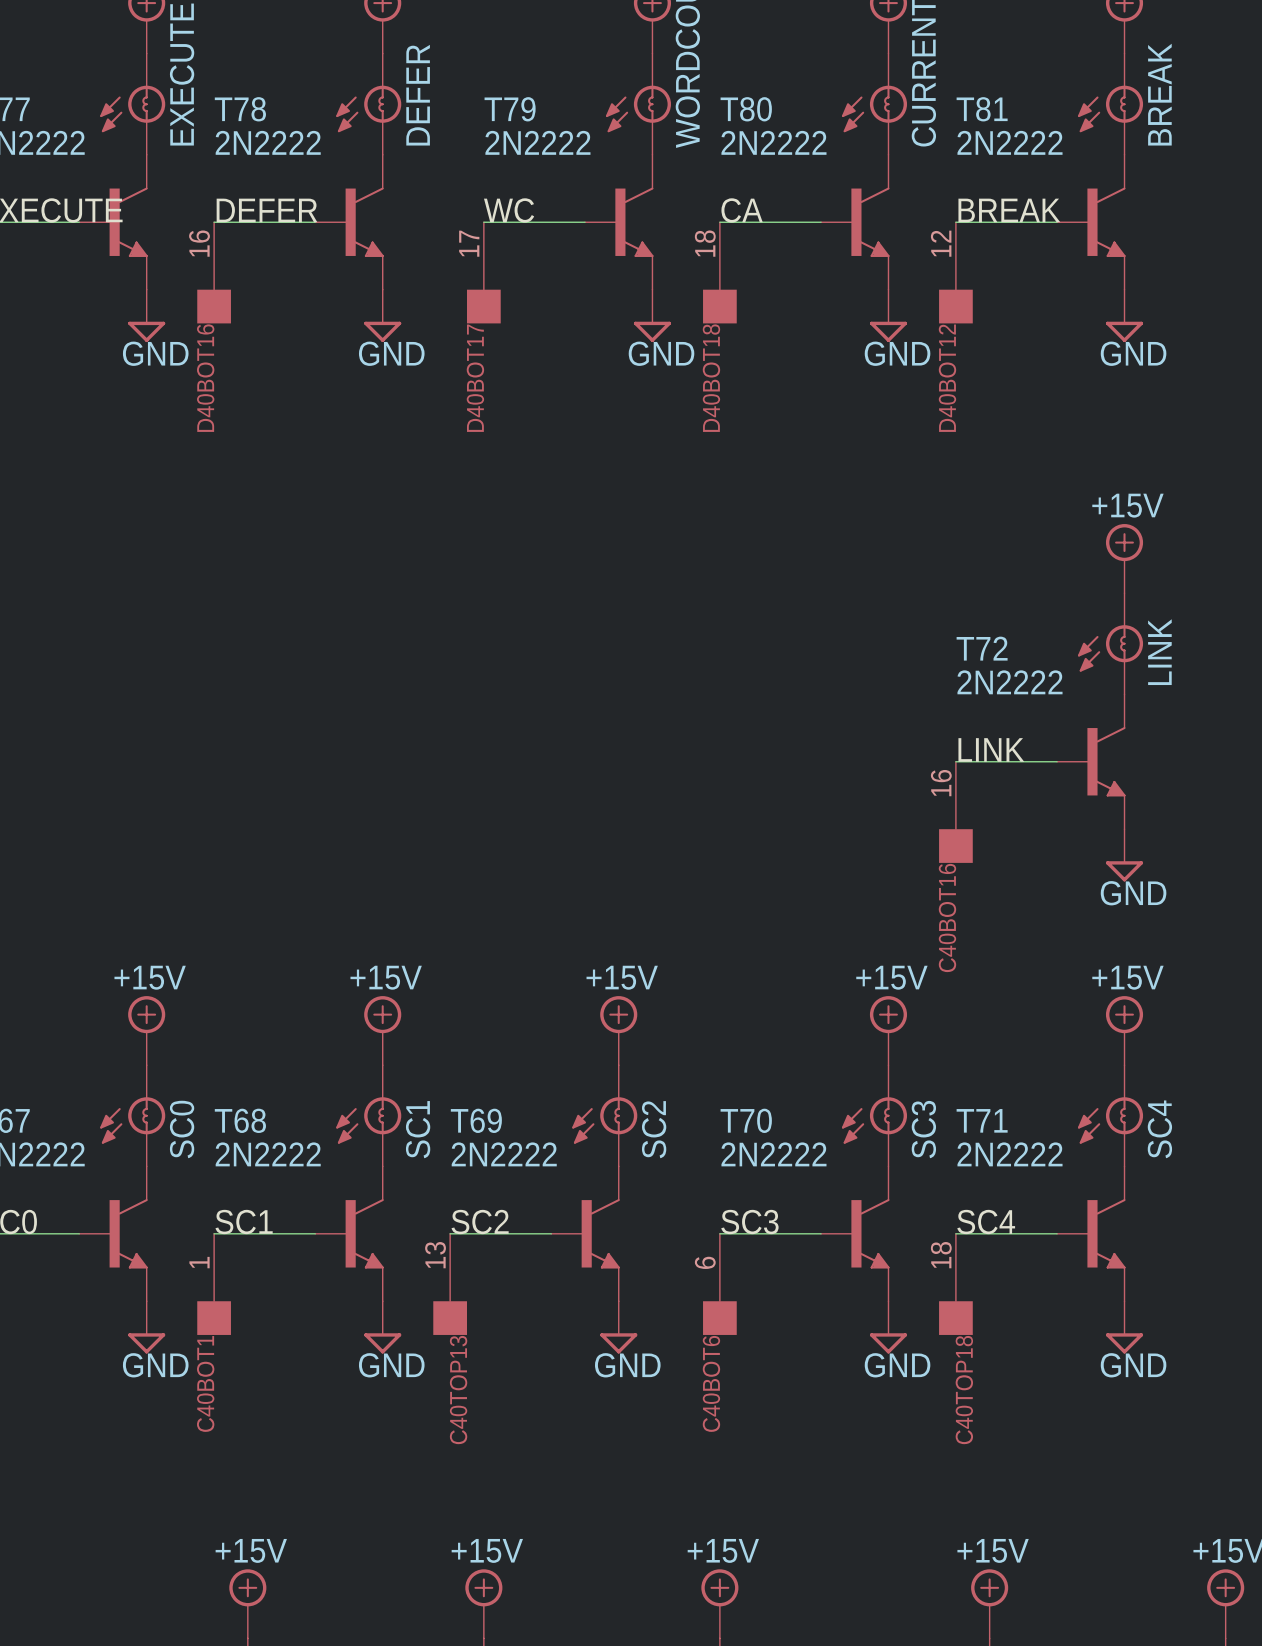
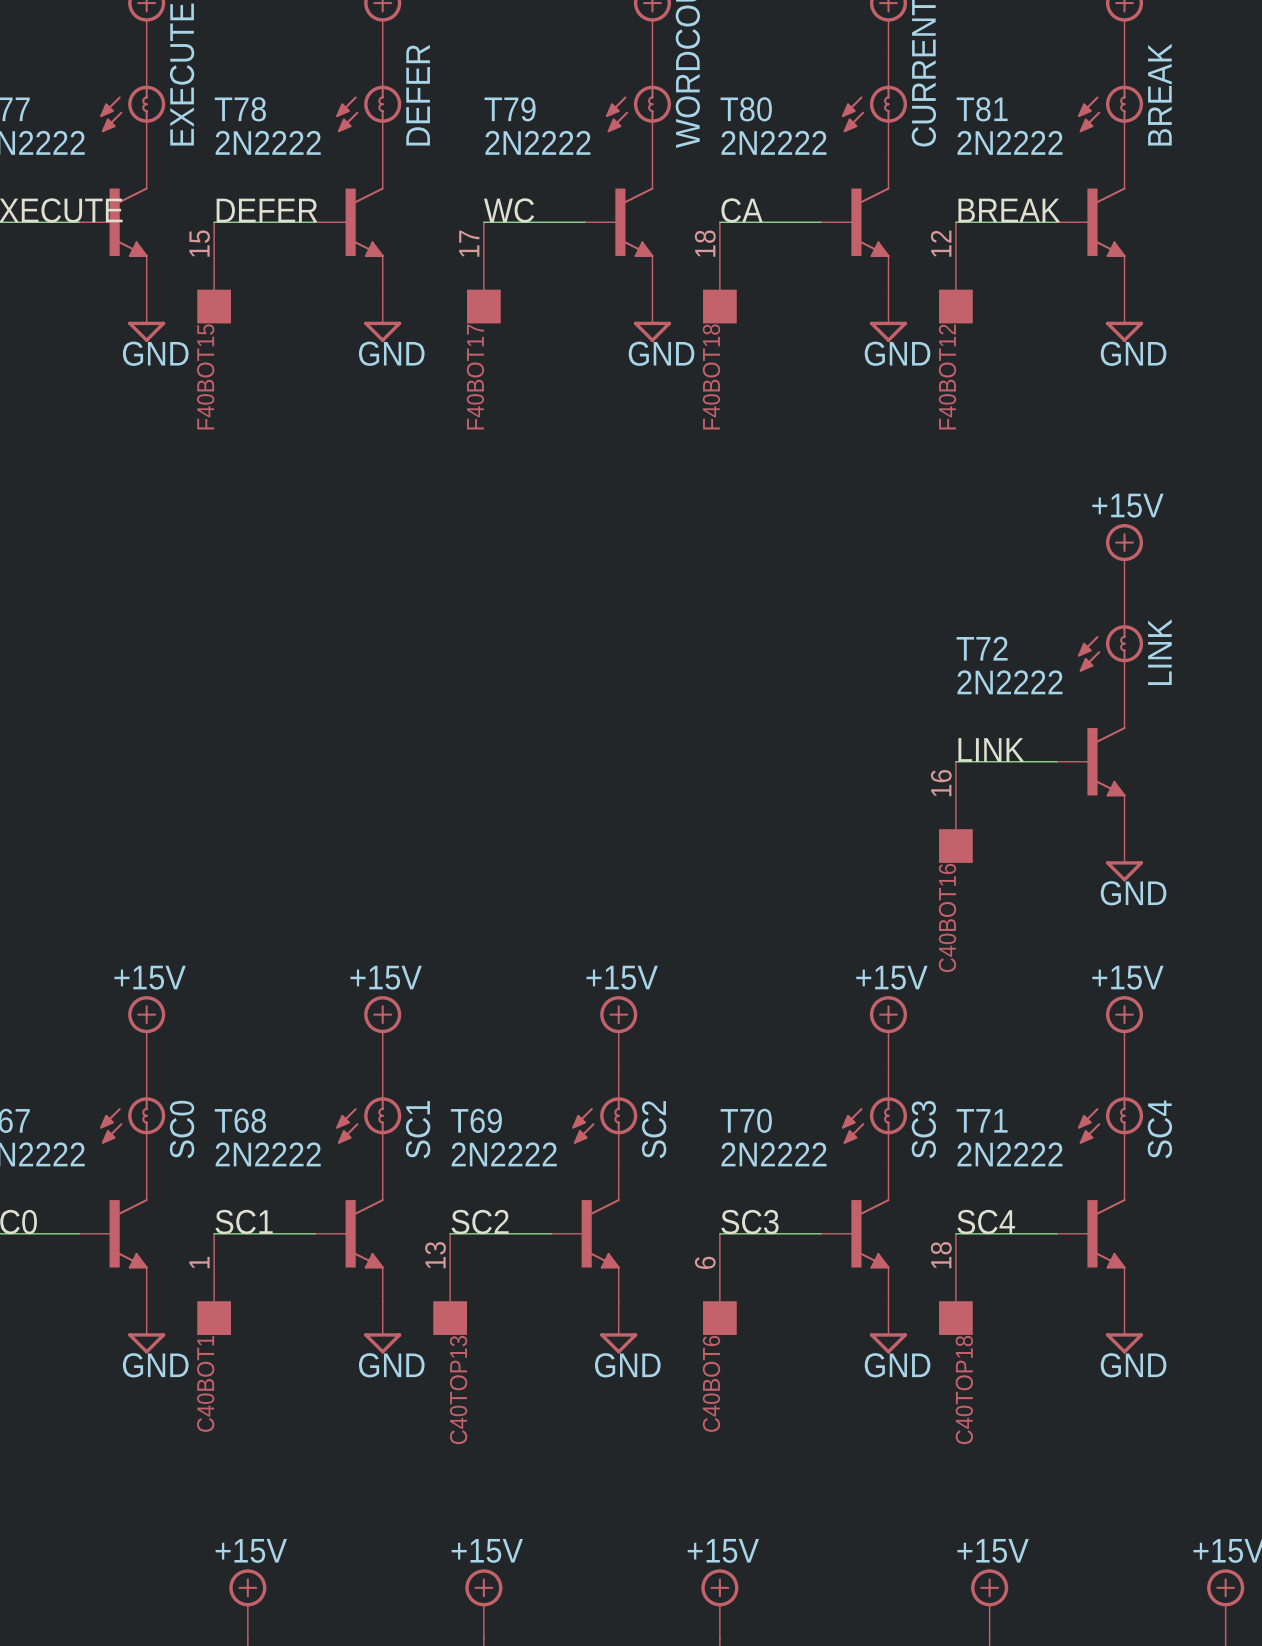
D40BOT16 pin number: 16 (199, 243) -> 15 (199, 243)
D40BOT16 name: D40BOT16 (205, 378) -> F40BOT15 (205, 376)
D40BOT17 name: D40BOT17 (475, 378) -> F40BOT17 (475, 376)
D40BOT18 name: D40BOT18 (711, 378) -> F40BOT18 (711, 376)
D40BOT12 name: D40BOT12 (947, 378) -> F40BOT12 (947, 376)

